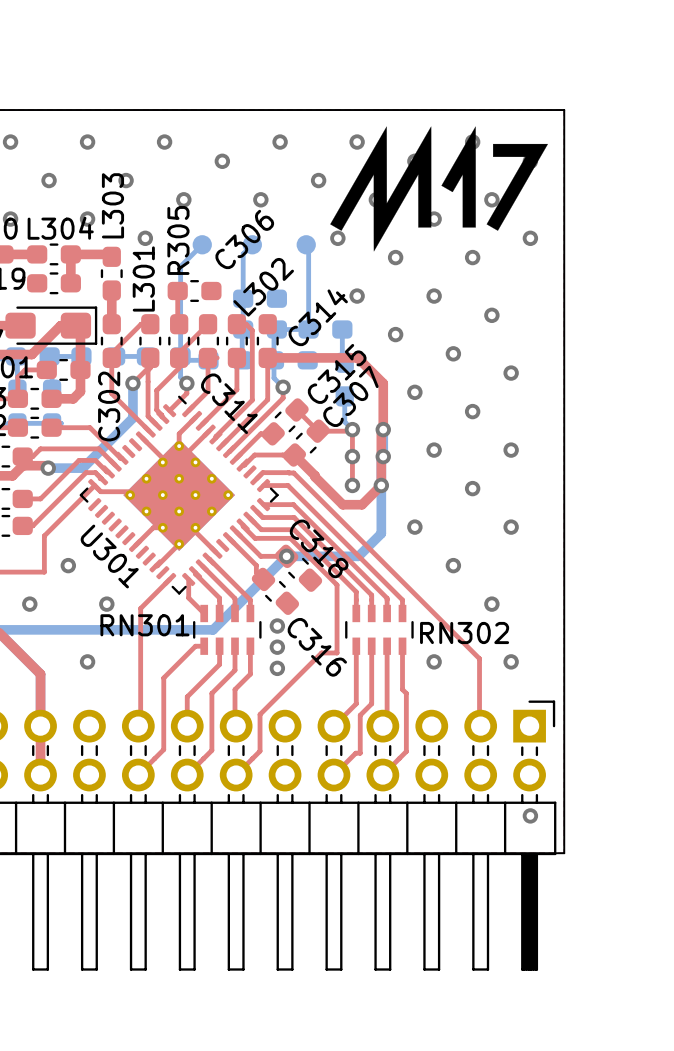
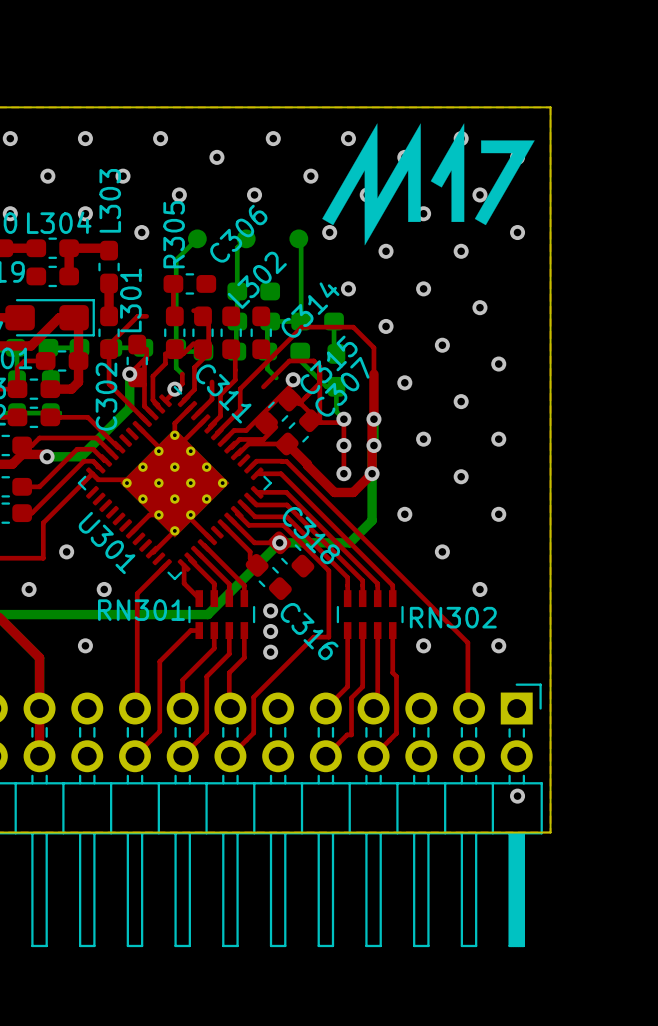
top track: (208, 324) (179, 353) (179, 368) (156, 390) -> (193, 343) (183, 353) (165, 353) (165, 363) (152, 376) (152, 380)
top track: (236, 324) (246, 324) (252, 330) (252, 400) (225, 426) -> (235, 358) (235, 379) (220, 394) (220, 416)
L301 position: (150, 341) -> (137, 360)
top track: (217, 357) (208, 357) (208, 391) (188, 410) -> (193, 310) (202, 310) (208, 316) (208, 353) (194, 367) (194, 389) (184, 400)
top track: (236, 357) (236, 389) (217, 409) -> (212, 381) (212, 399)
bottom track: none -> (300, 351) (300, 360) (326, 386) (336, 386)
via position: (186, 383) -> (174, 389)
top track: (383, 383) (357, 357) (267, 357) (267, 399) (222, 444) -> (373, 374) (373, 347) (353, 327) (301, 327) (240, 388) (240, 410) (217, 433)
top track: (283, 387) (283, 398) (229, 451) -> (293, 379) (293, 383) (246, 430) (234, 430) (223, 440)
via position: (283, 387) -> (293, 379)
top track: none -> (319, 383) (299, 403) (319, 422)
top track: none -> (263, 386) (289, 360) (313, 360) (319, 366) (319, 422)
top track: (296, 410) (318, 431) (350, 431) -> (319, 422) (340, 422) (342, 420)
top track: (273, 433) (260, 433) (236, 458) -> (275, 427) (263, 439) (239, 439) (230, 447)

